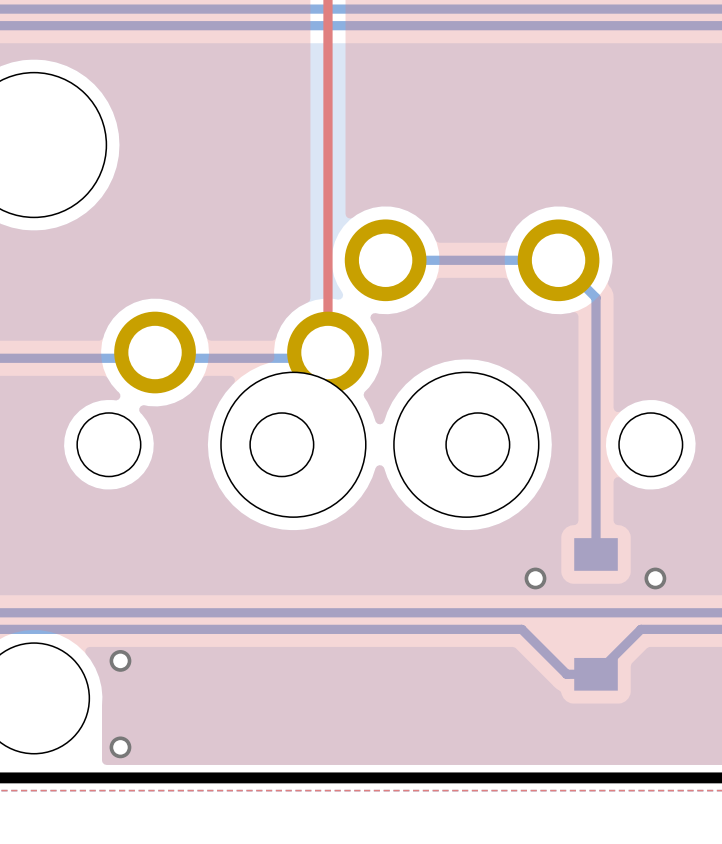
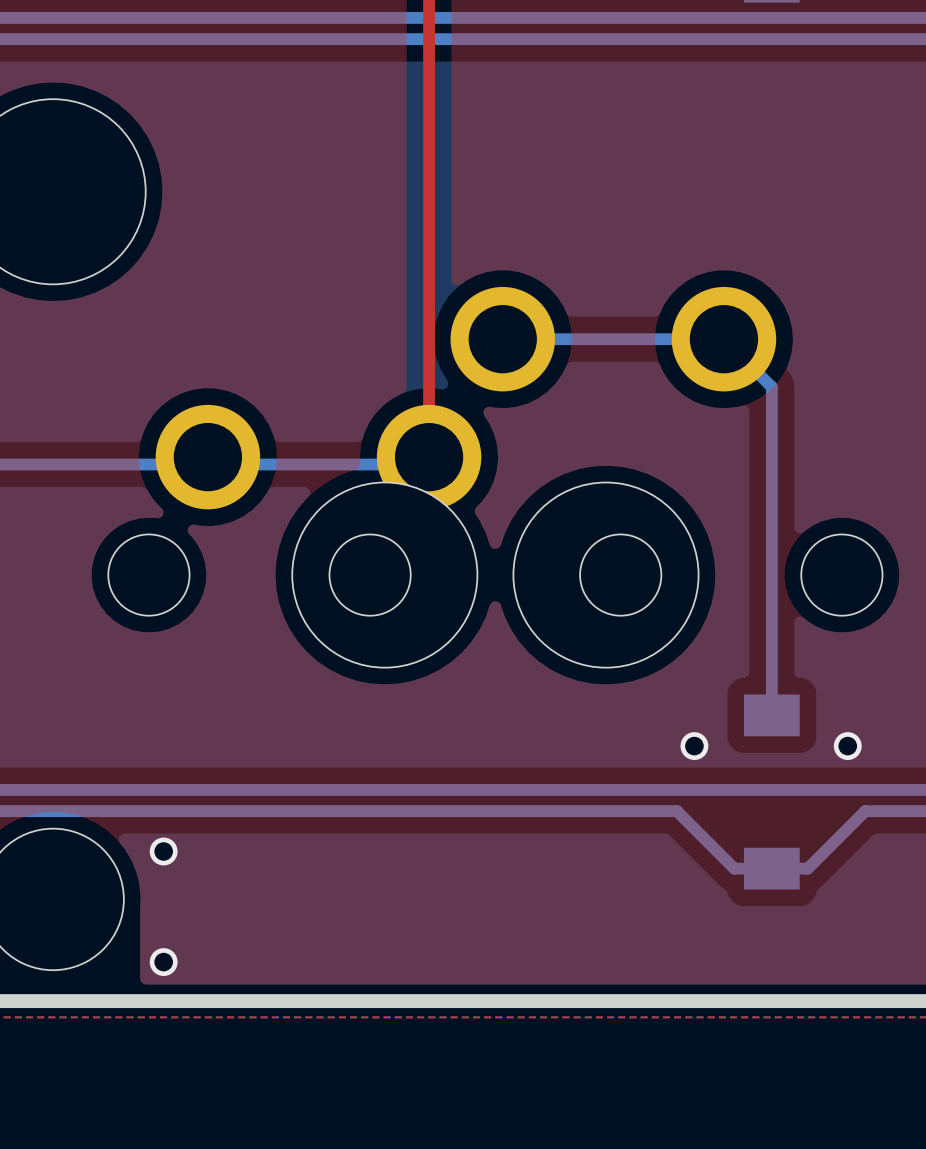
bottom track: (669, 629) (640, 629) (596, 674) -> (865, 811) (807, 868) (771, 868)

